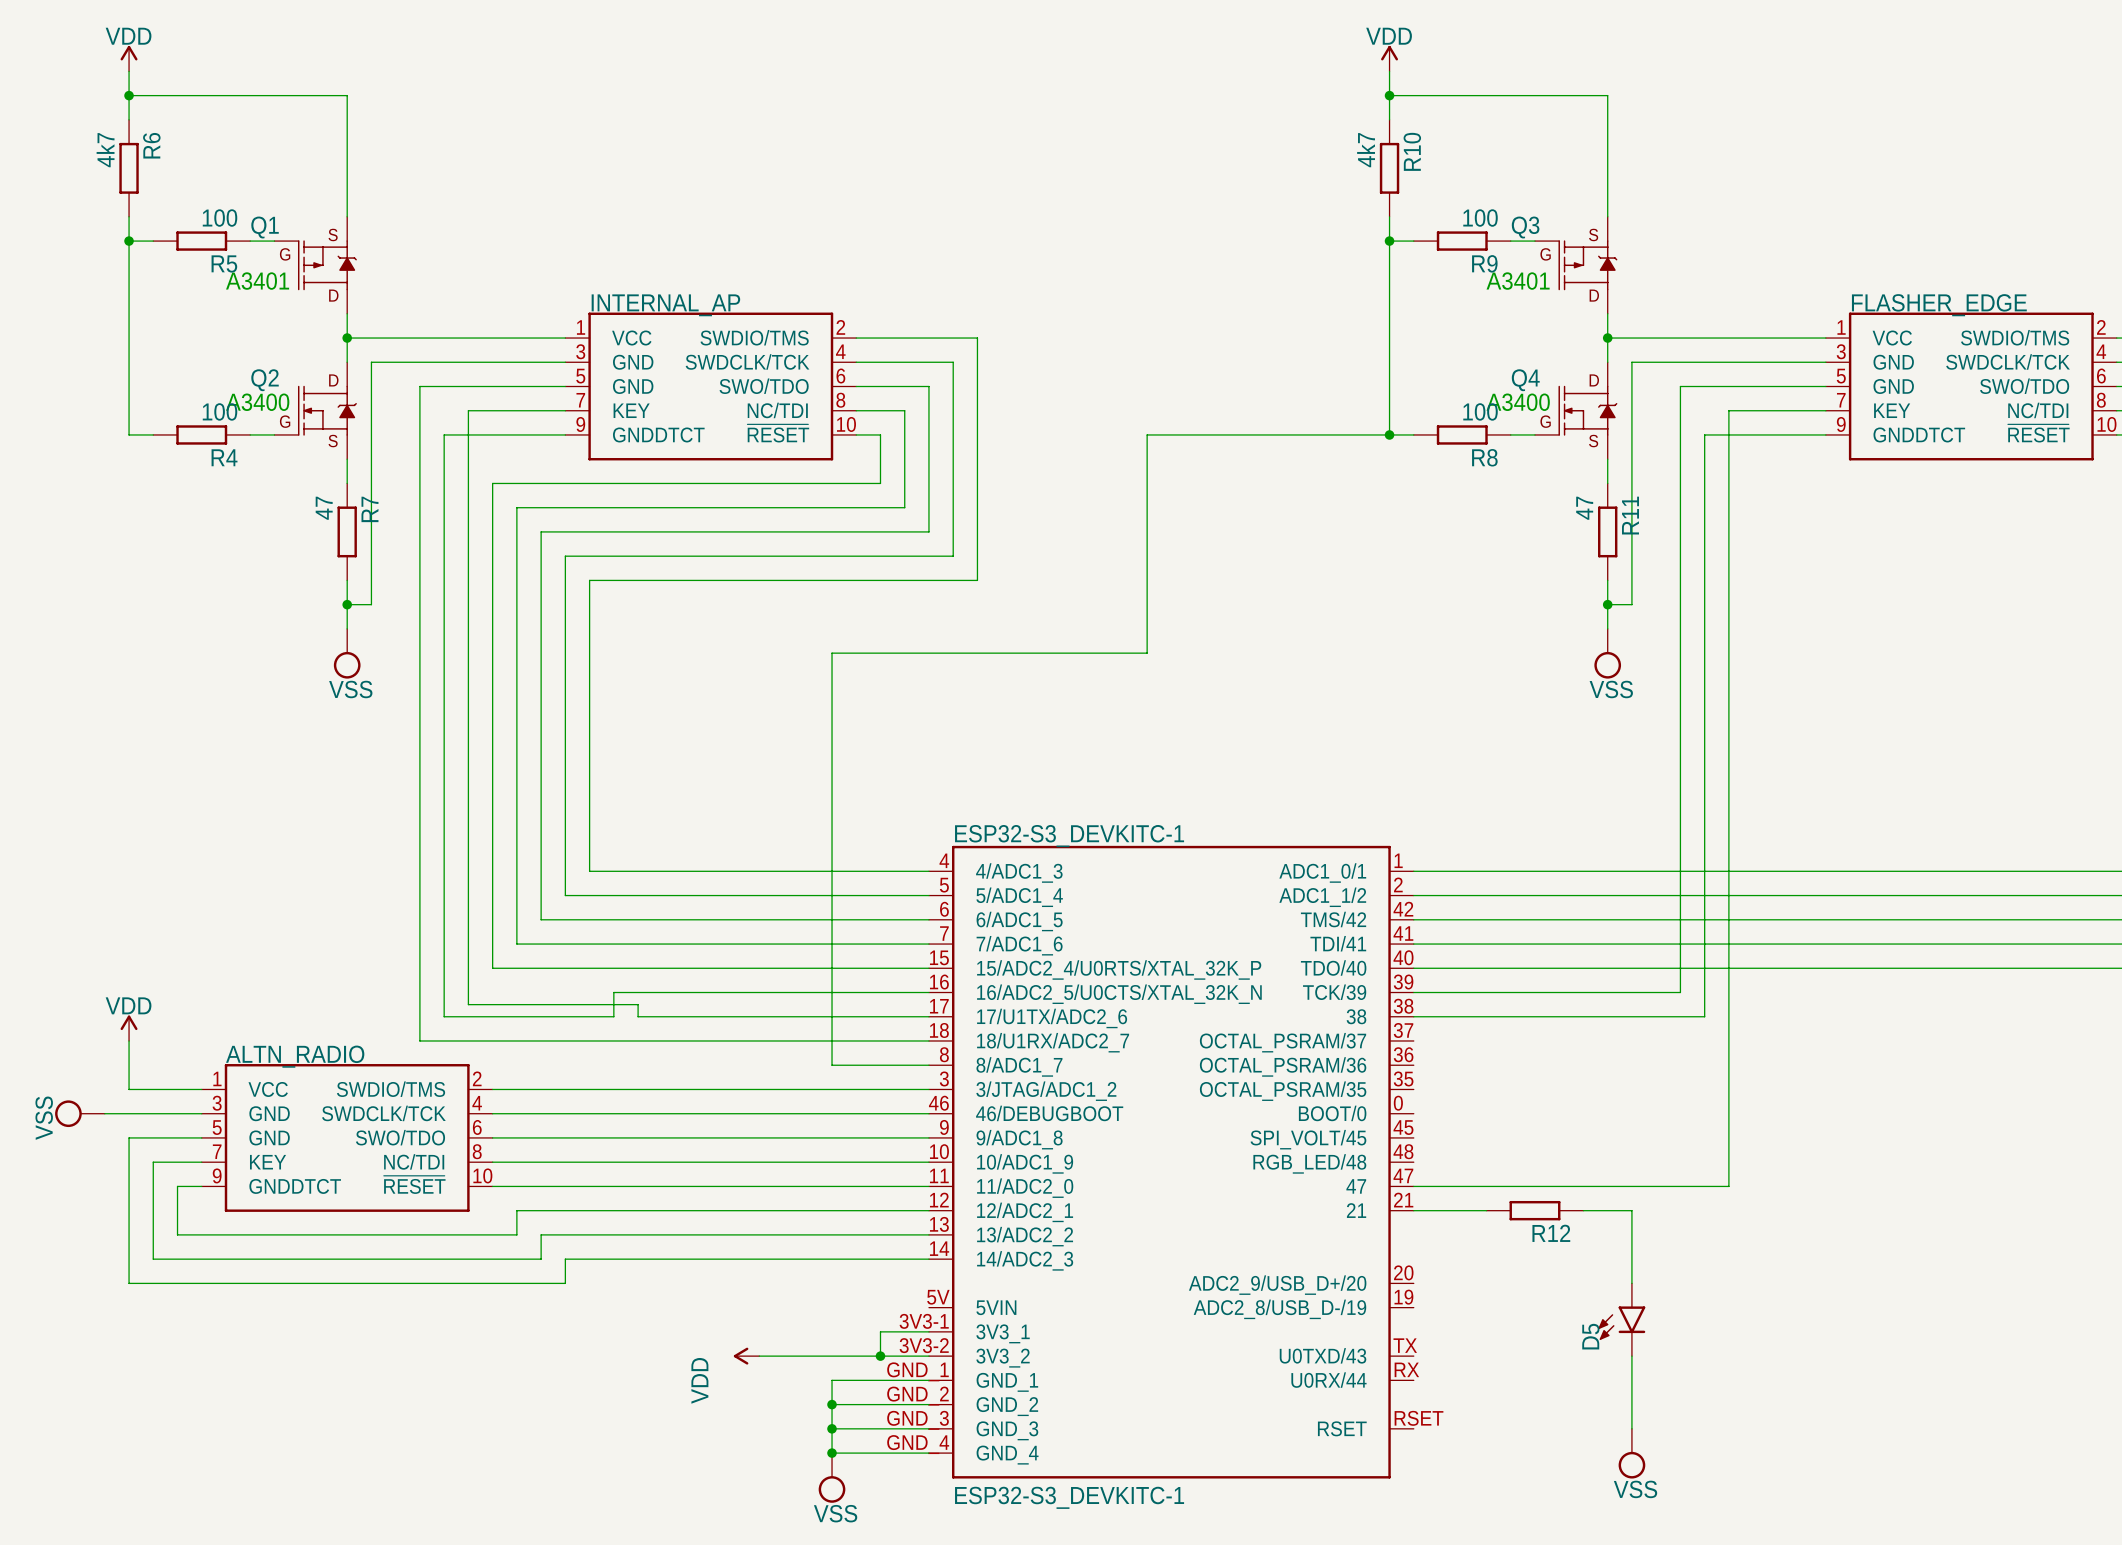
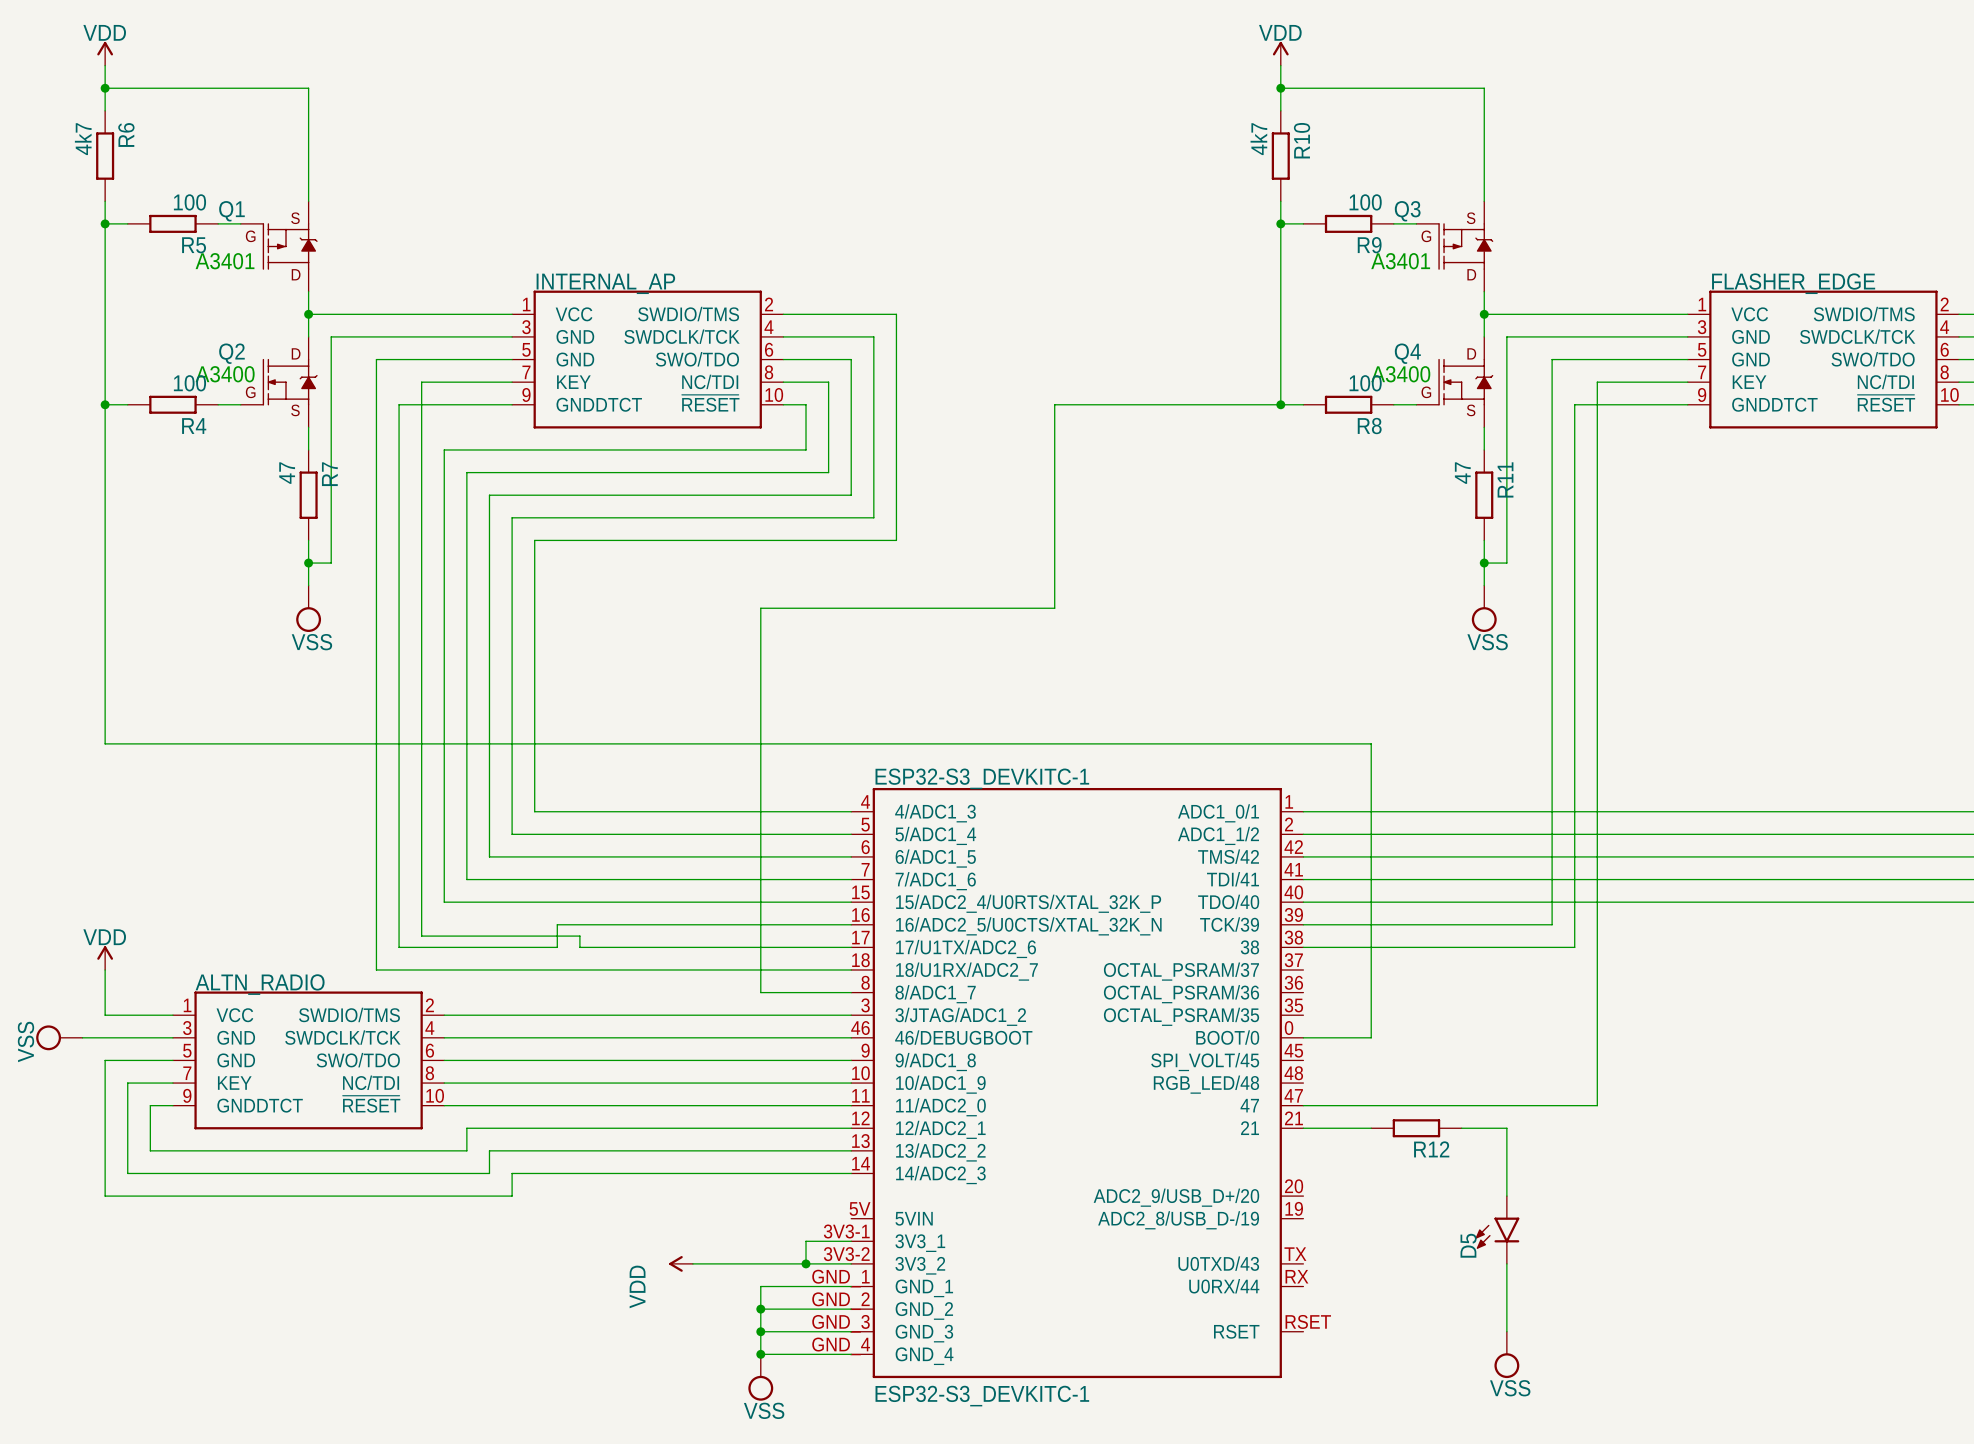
wire: none -> (105, 404) (105, 743) (1371, 743) (1371, 1037) (1303, 1037)
junction: none -> (105, 404)

